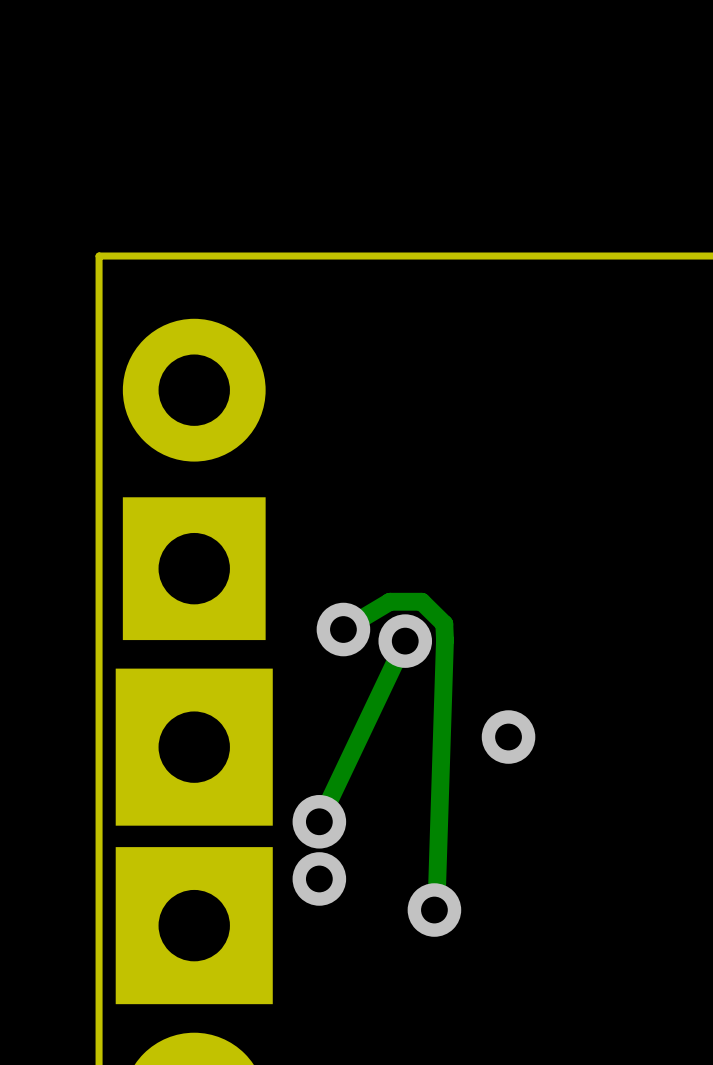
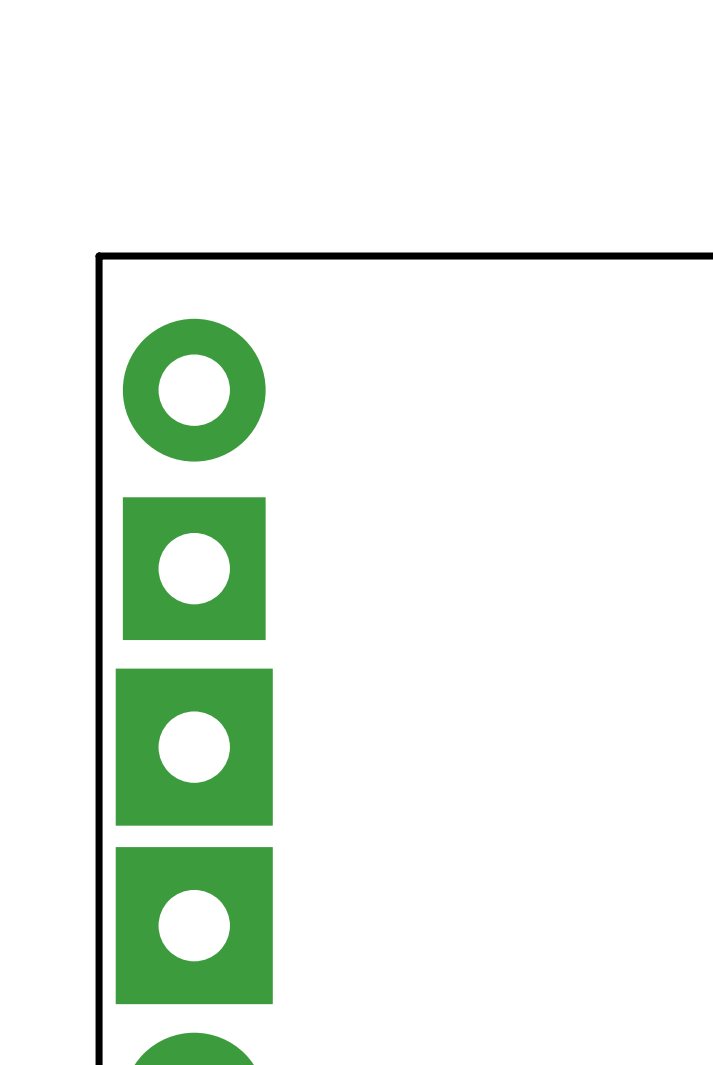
track: (343, 629) (389, 601) (421, 601) (444, 623) (436, 910) (434, 910) -> none
via: (343, 629) -> none
track: (405, 641) (319, 821) -> none
via: (405, 641) -> none
via: (508, 737) -> none
via: (319, 821) -> none
via: (319, 878) -> none
via: (434, 910) -> none

